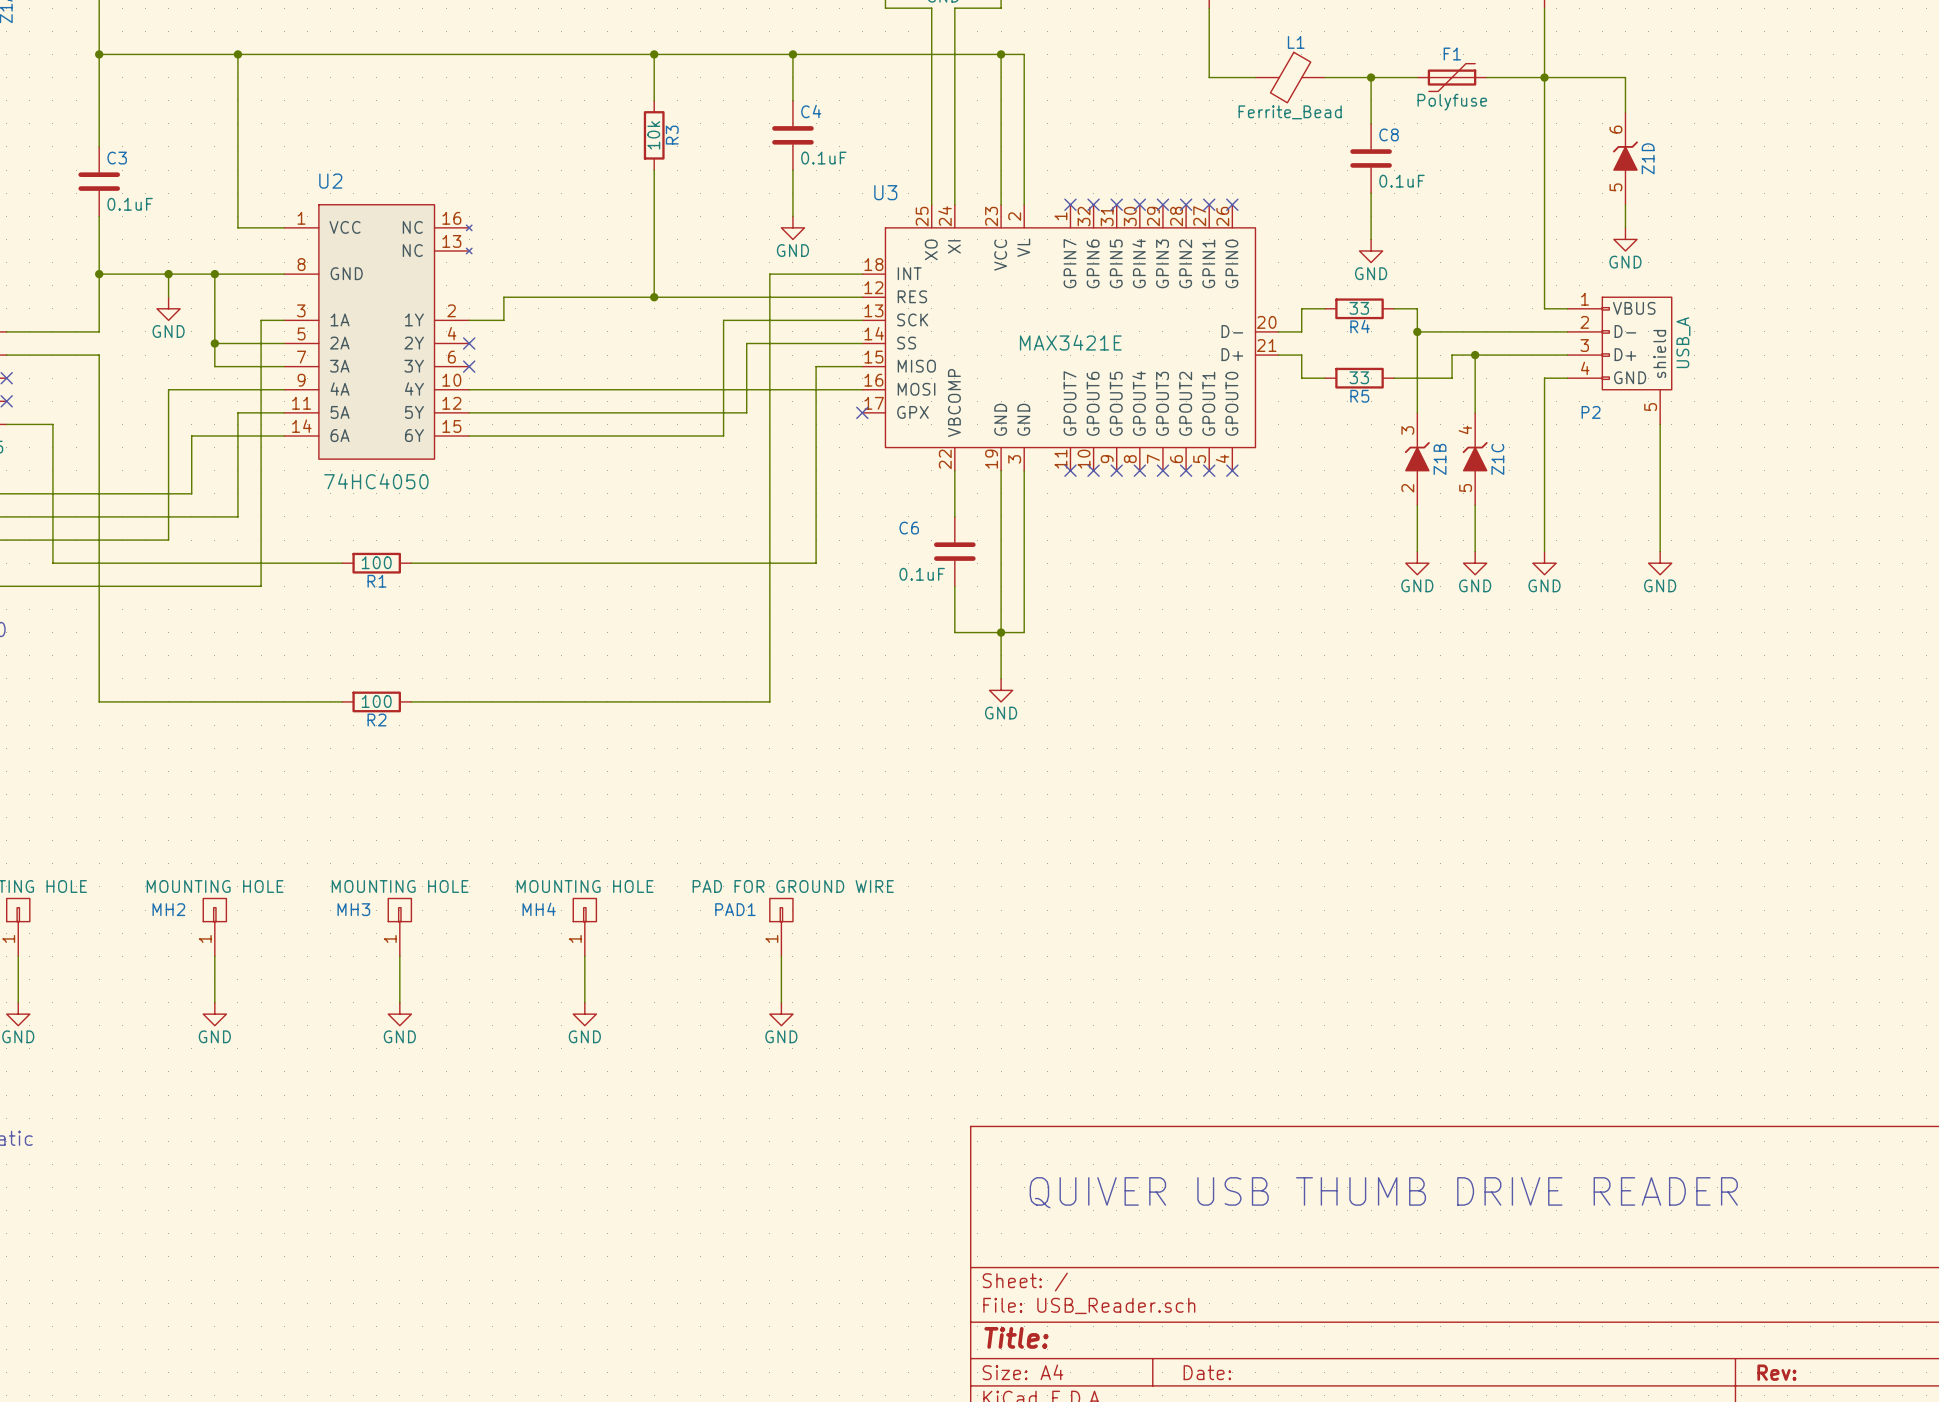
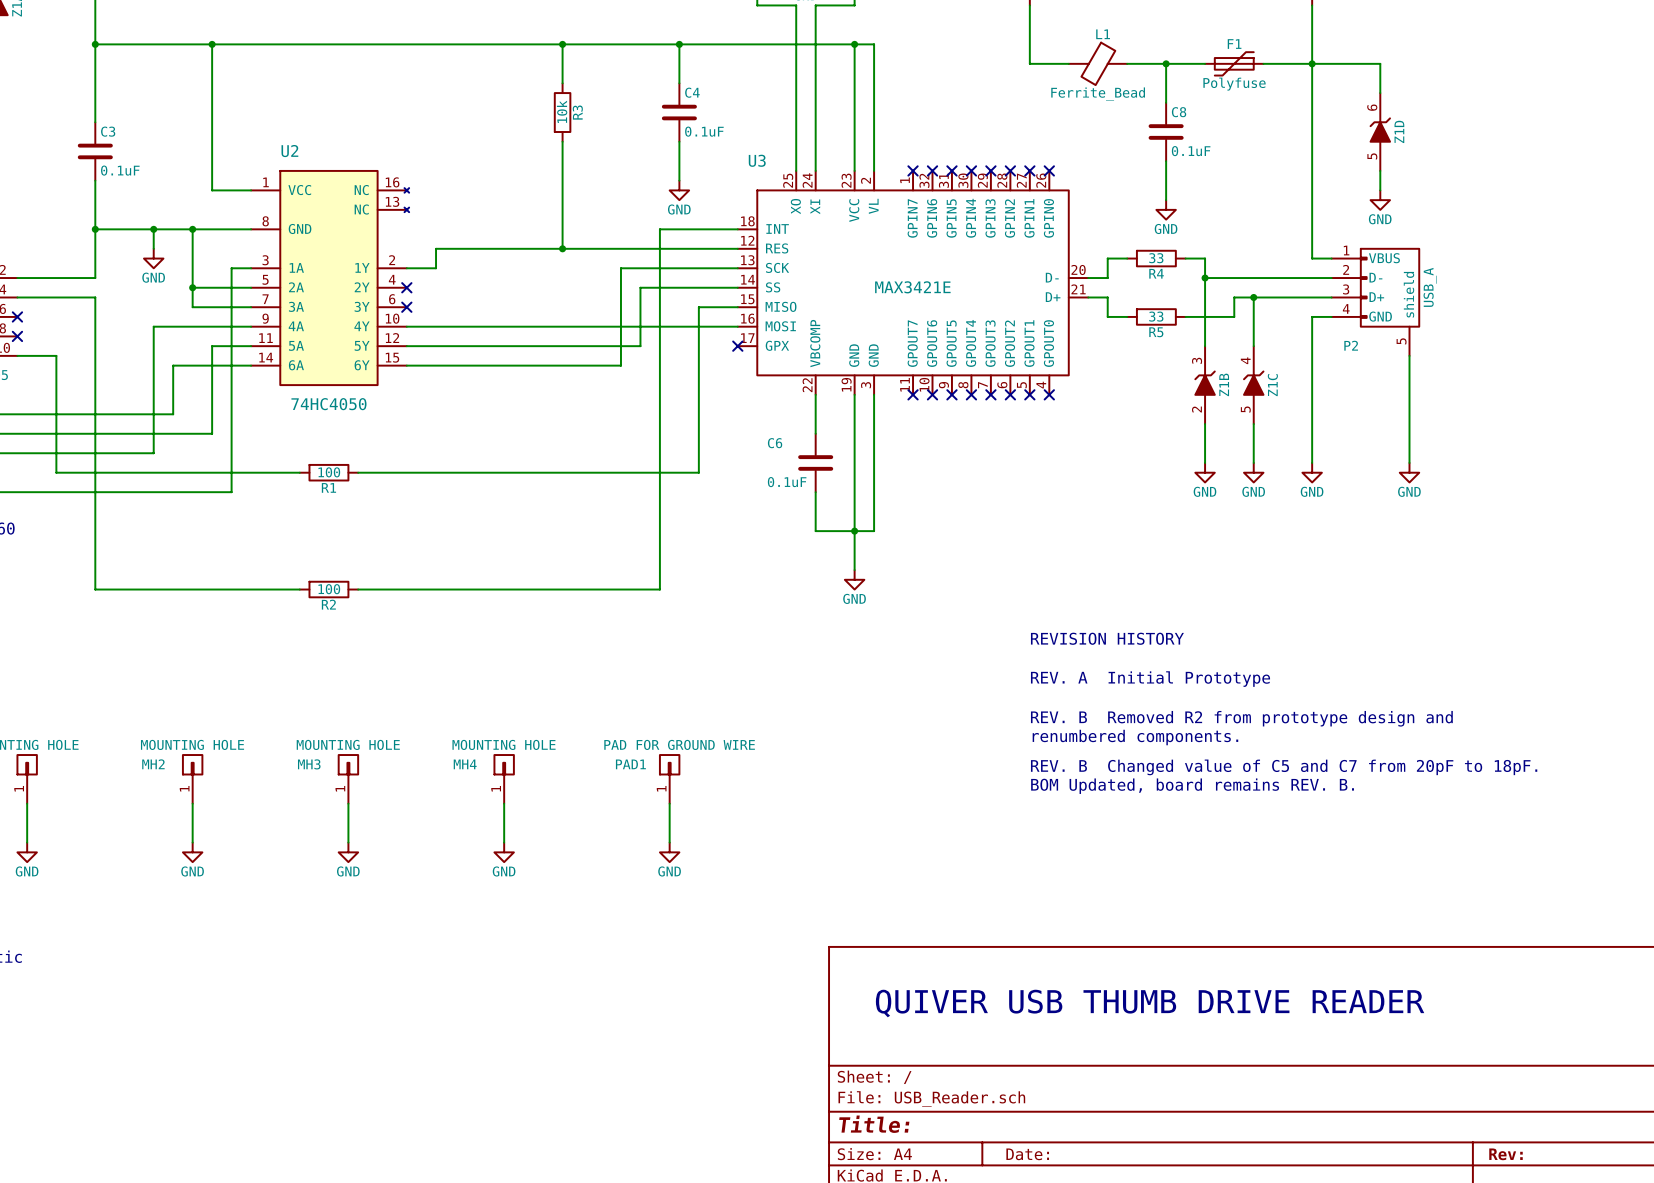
text: none -> REVISION HISTORY (1107, 638)
text: none -> REV. A Initial Prototype (1150, 679)
text: none -> REV. B Removed R2 from prototype design and (1241, 718)
text: none -> renumbered components. (1135, 737)
text: none -> REV. B Changed value of C5 and C7 from 20pF to 18pF. (1284, 767)
text: none -> BOM Updated, board remains REV. B. (1192, 786)

